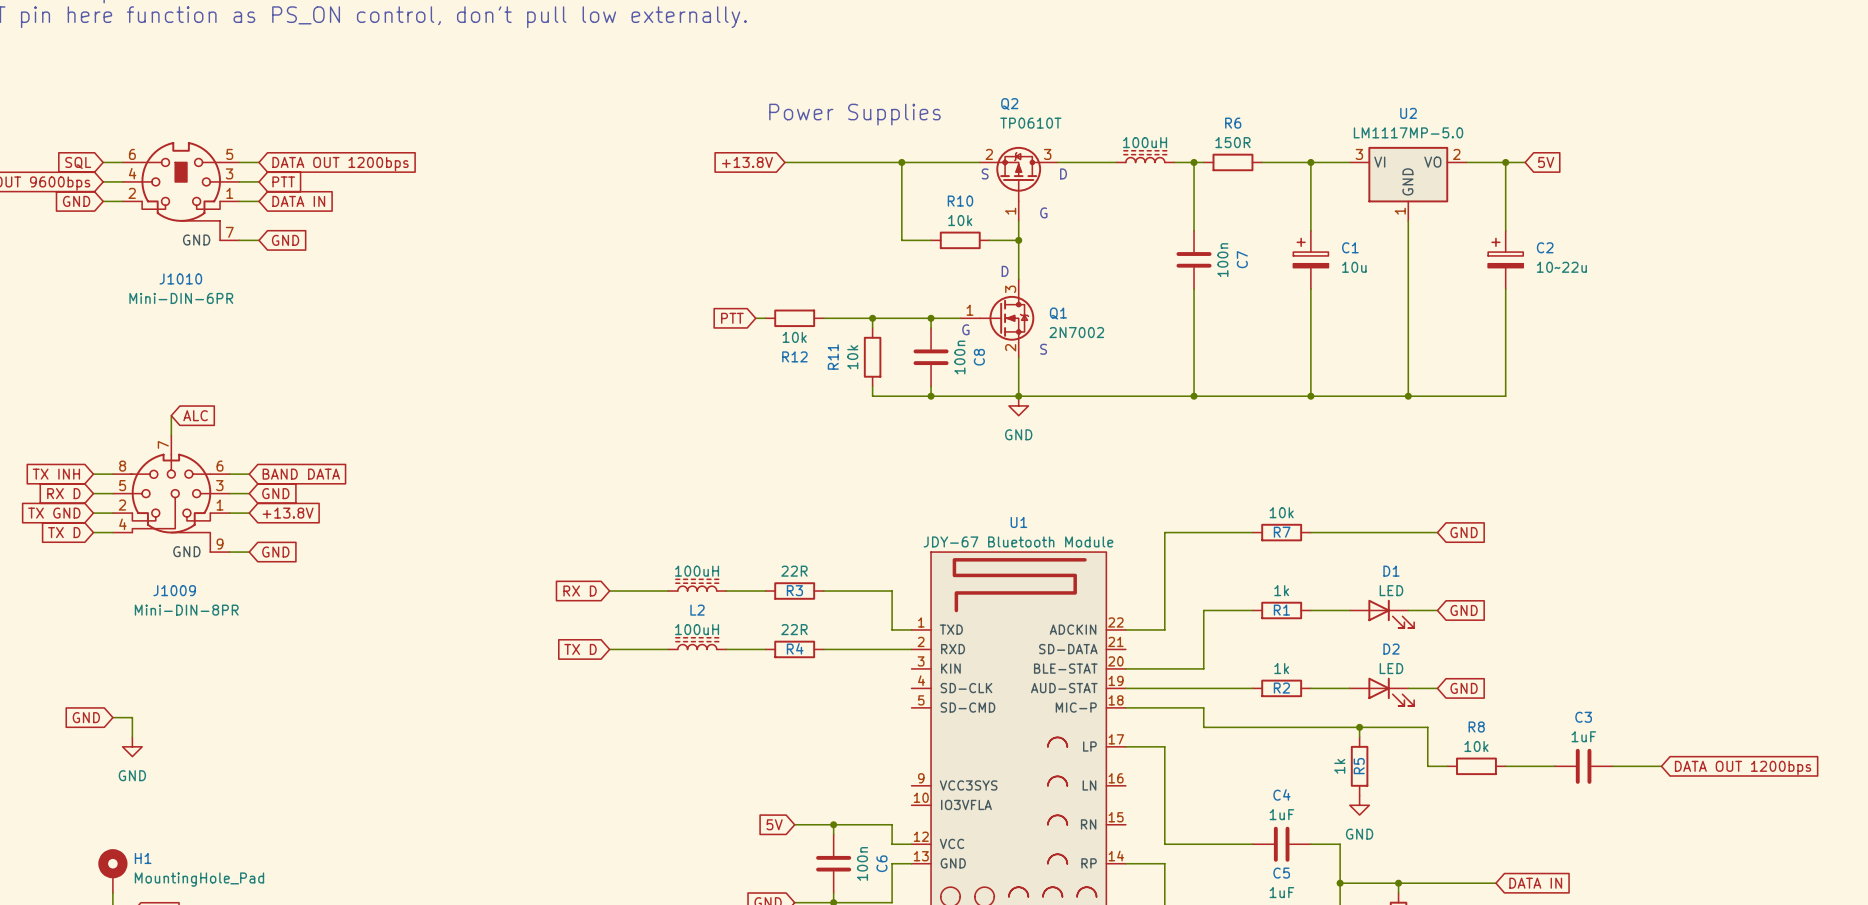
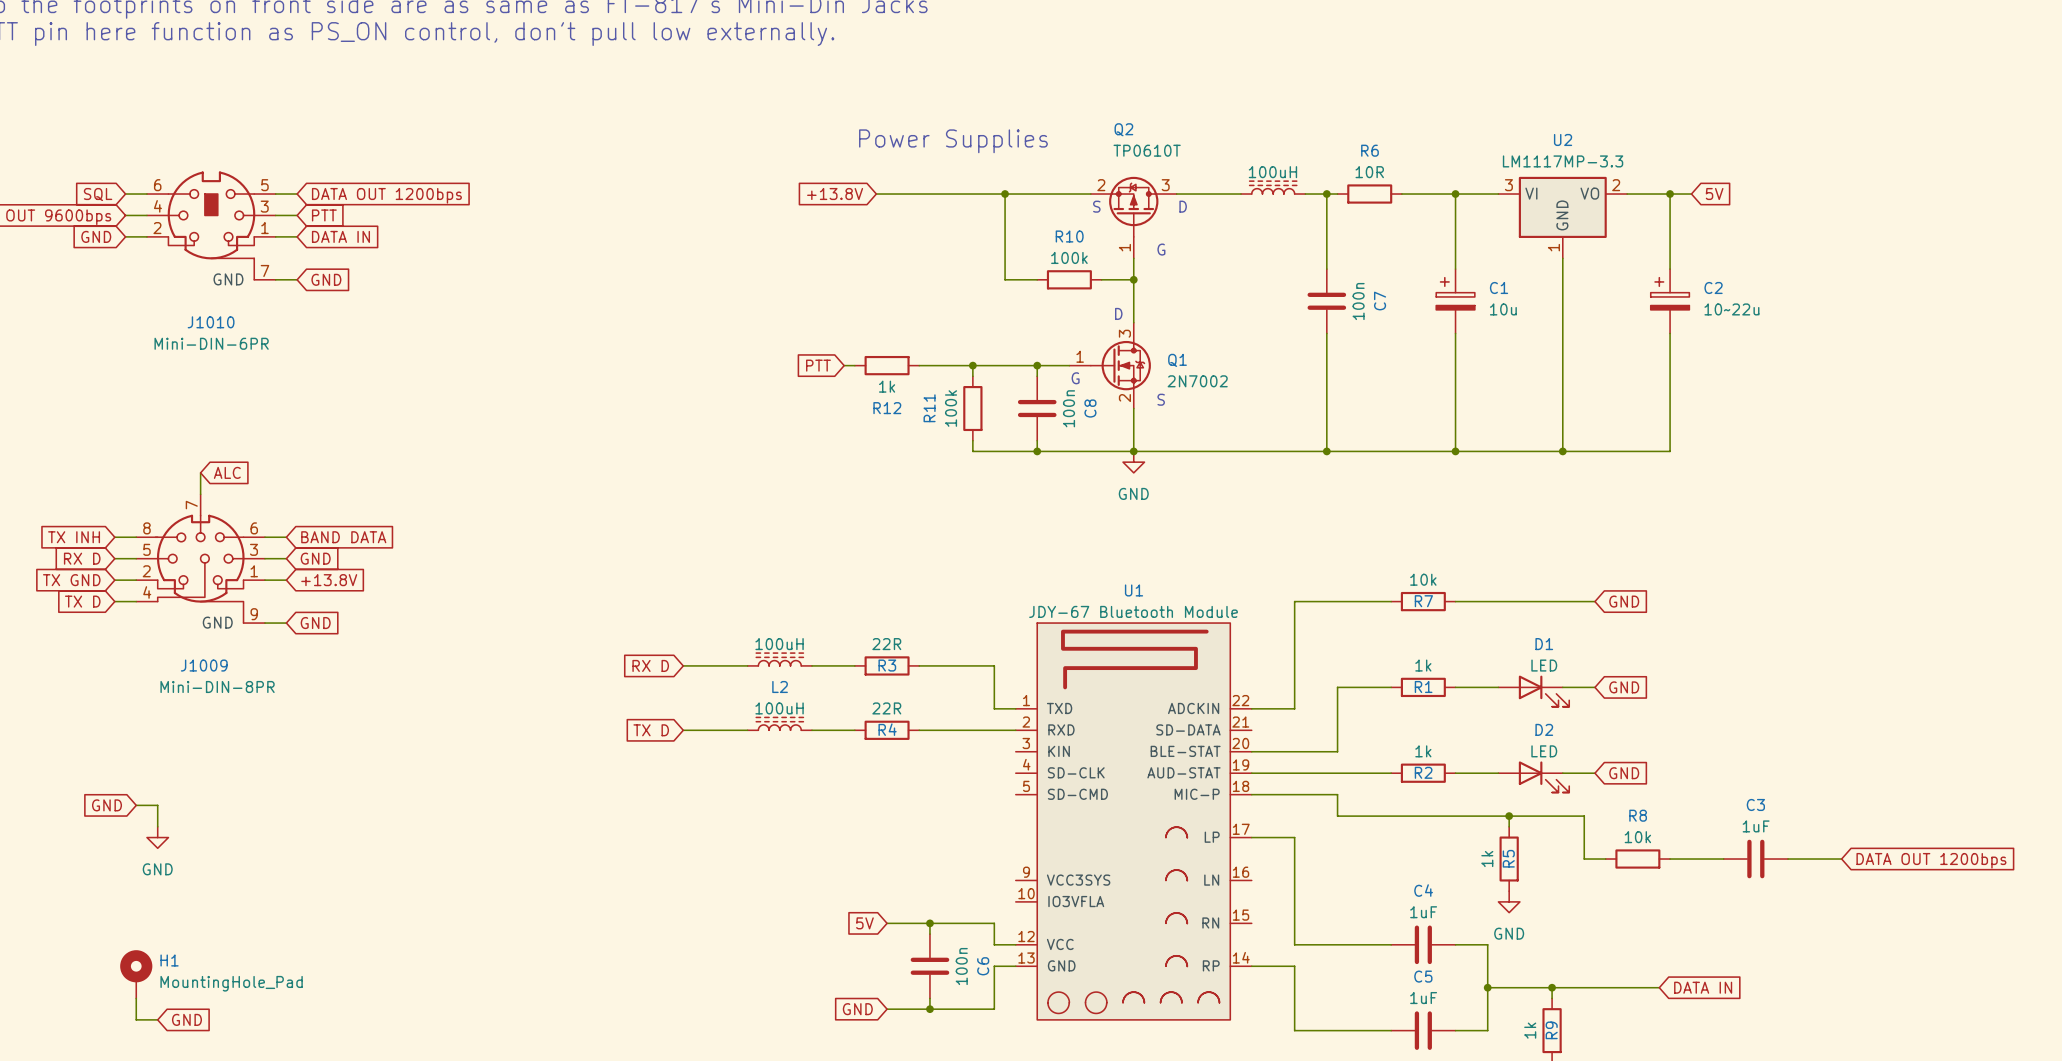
U2 value: LM1117MP-5.0 (1408, 132) -> LM1117MP-3.3 (1563, 161)
R6 value: 150R (1232, 142) -> 10R (1369, 172)
R10 value: 10k (960, 220) -> 100k (1069, 257)
R12 value: 10k (794, 337) -> 1k (887, 386)
R11 value: 10k (852, 357) -> 100k (951, 408)

